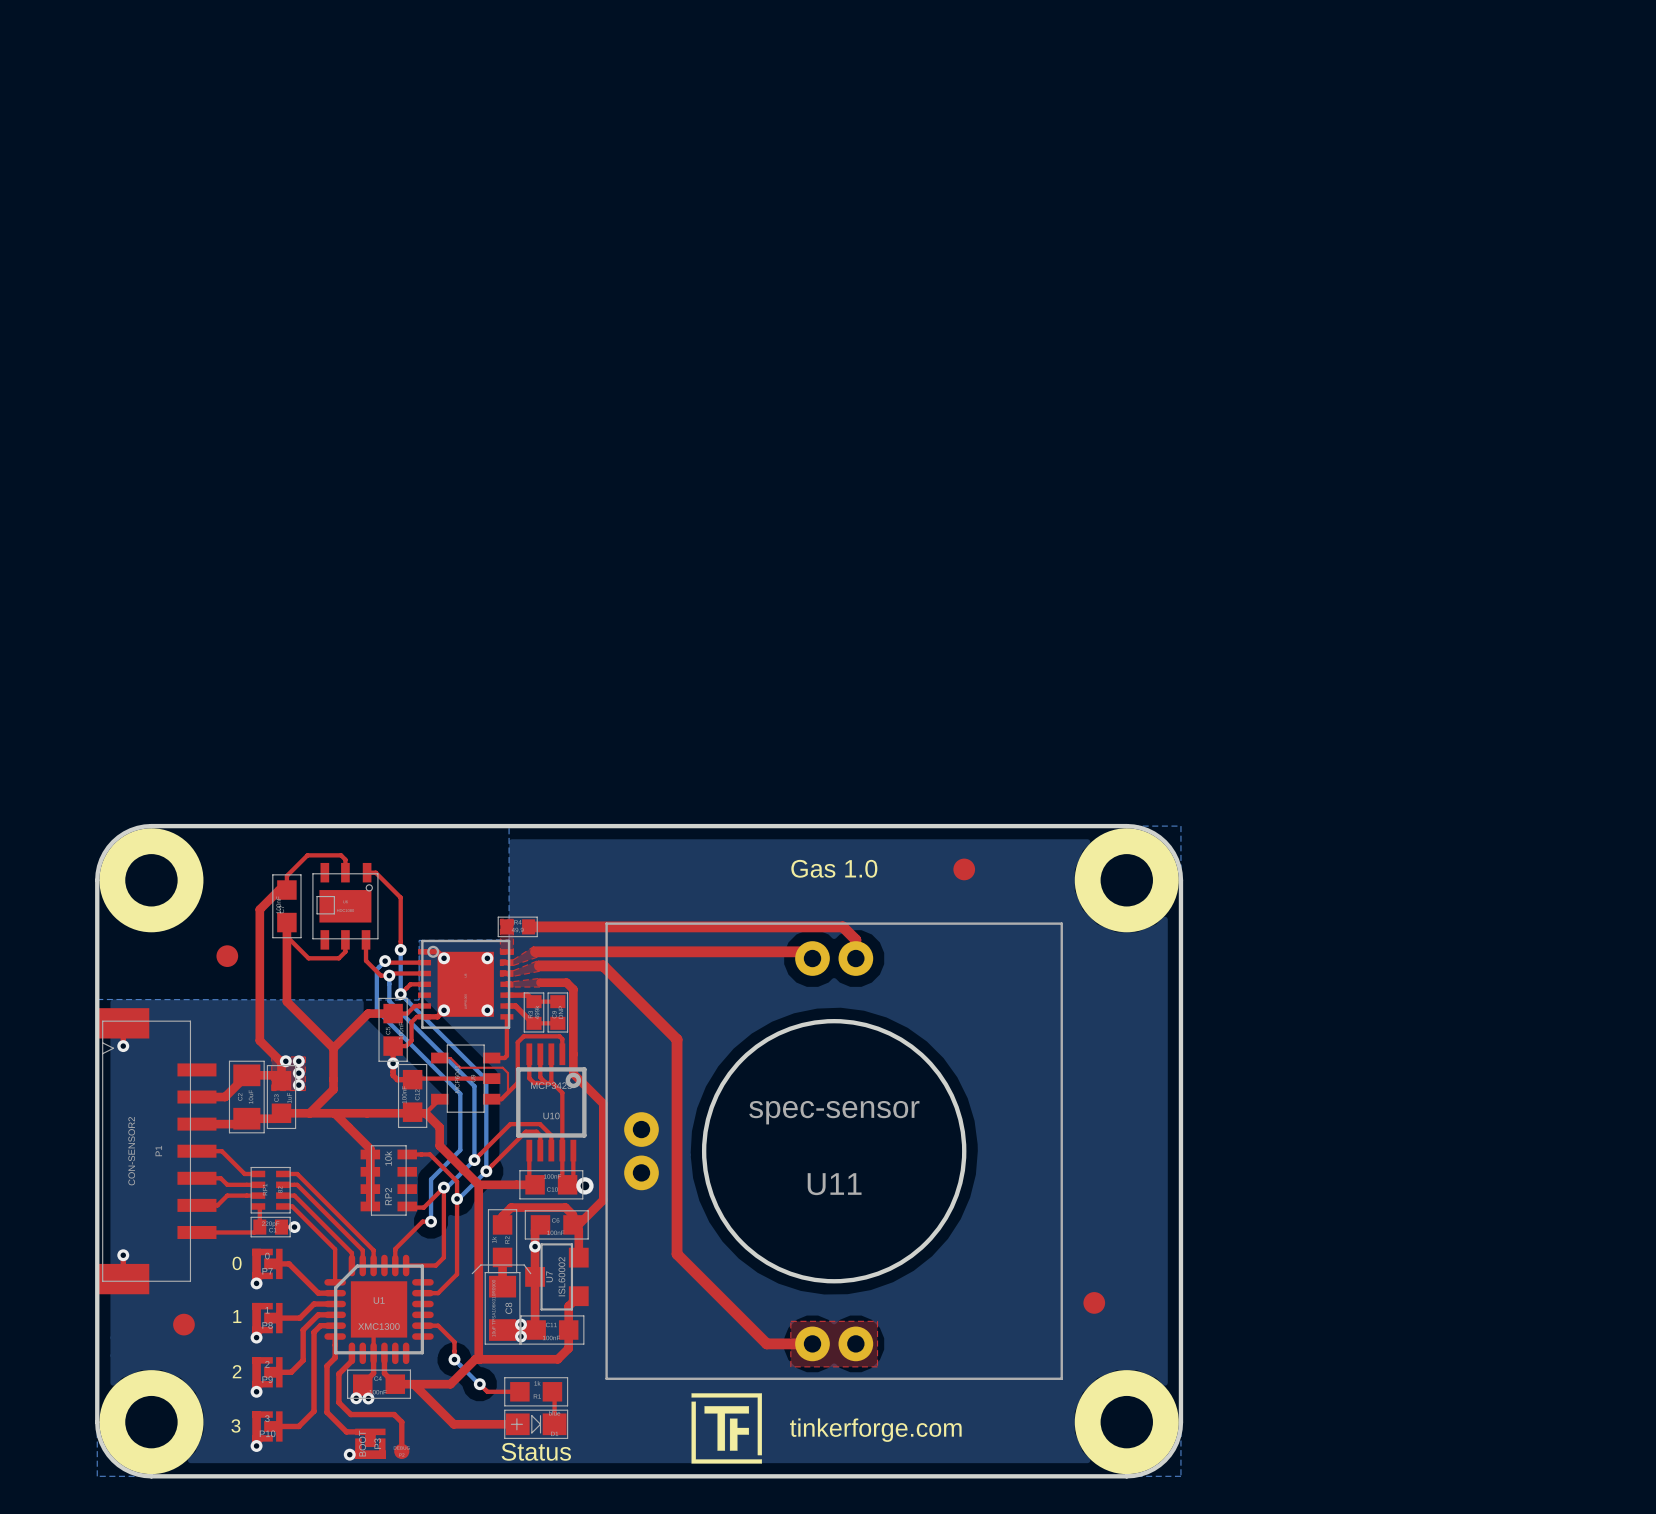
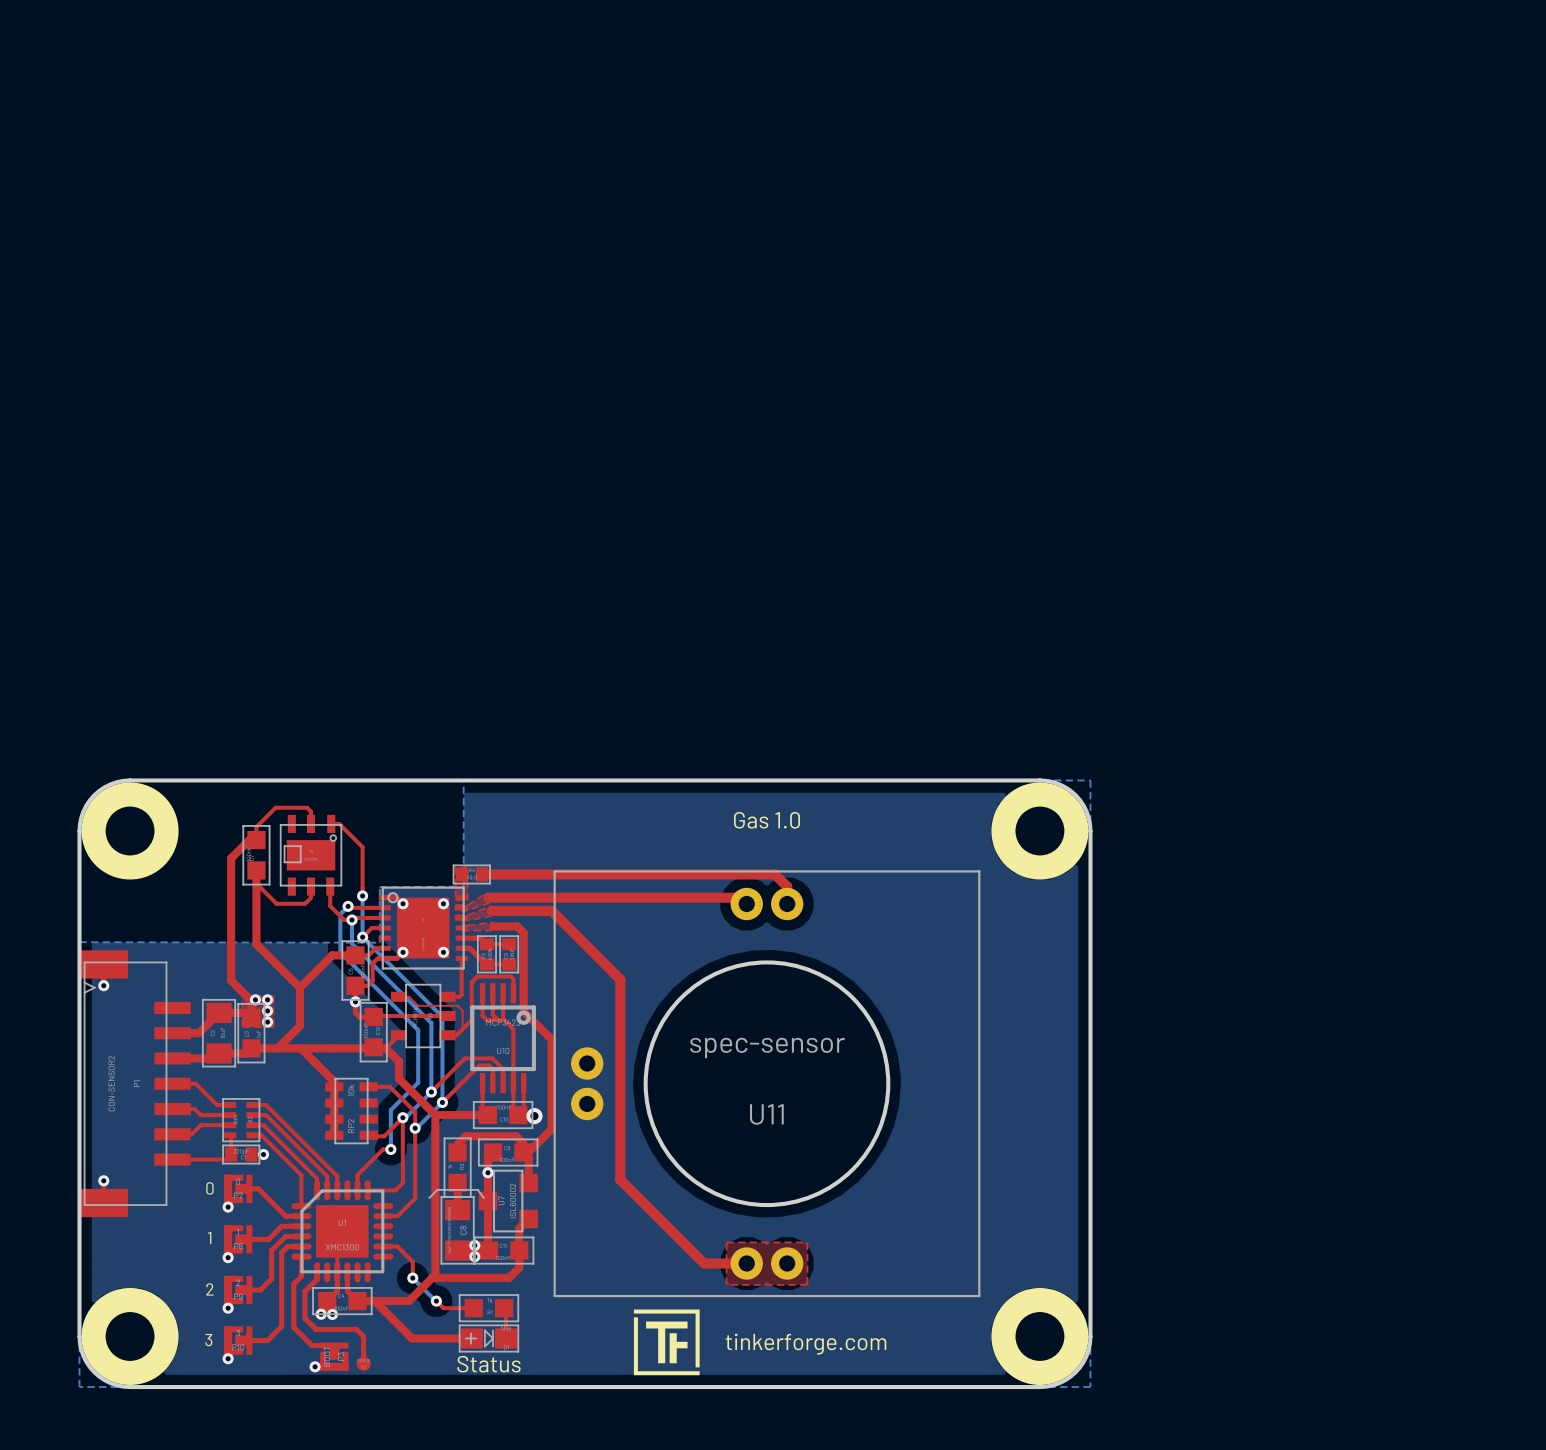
part: (964, 869) -> none
part: (227, 956) -> none
part: (1094, 1302) -> none
part: (183, 1324) -> none

